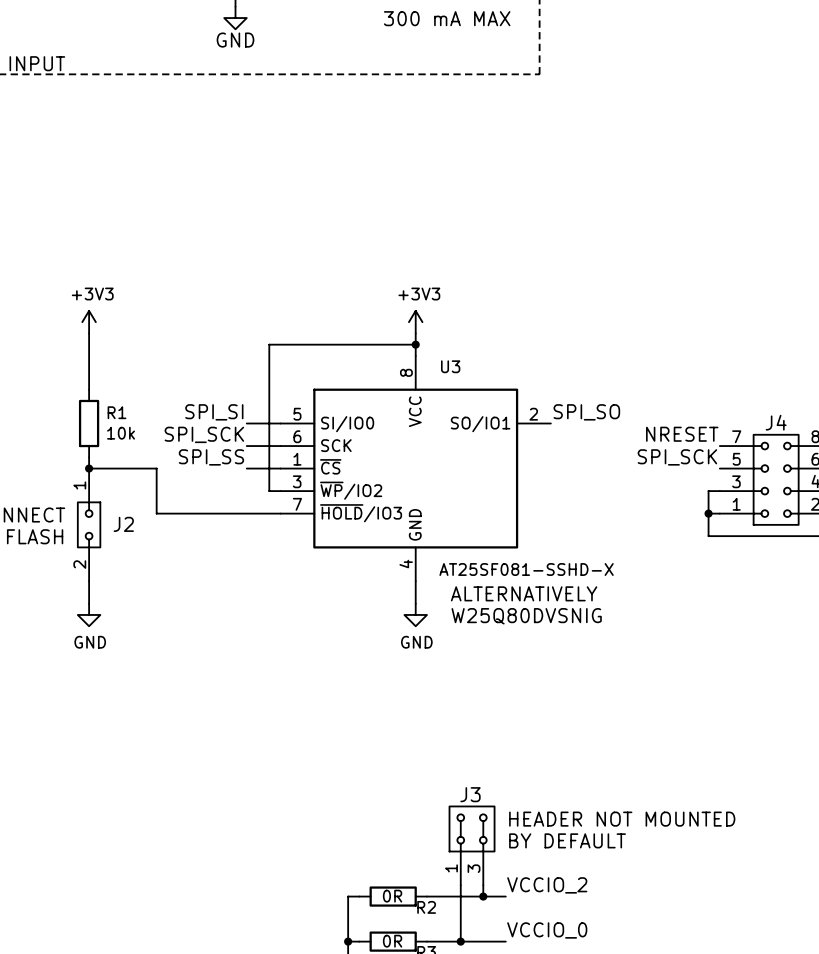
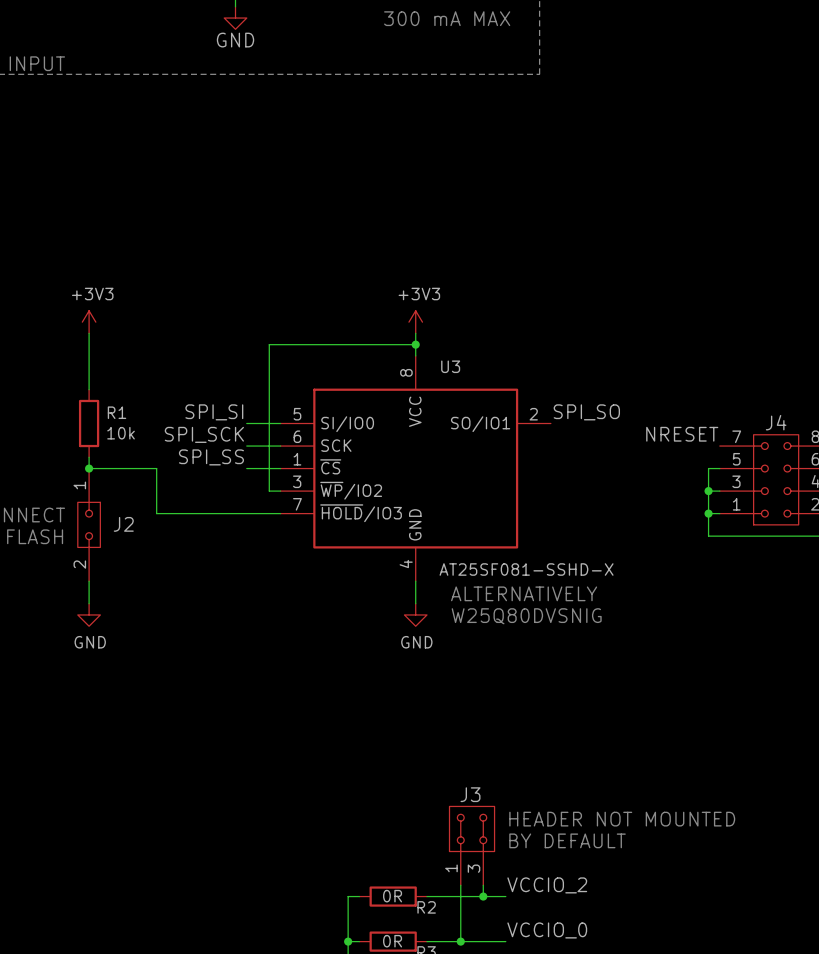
label: SPI_SCK (677, 457) -> none
wire: none -> (719, 468) (708, 468) (708, 491)
junction: none -> (708, 491)

